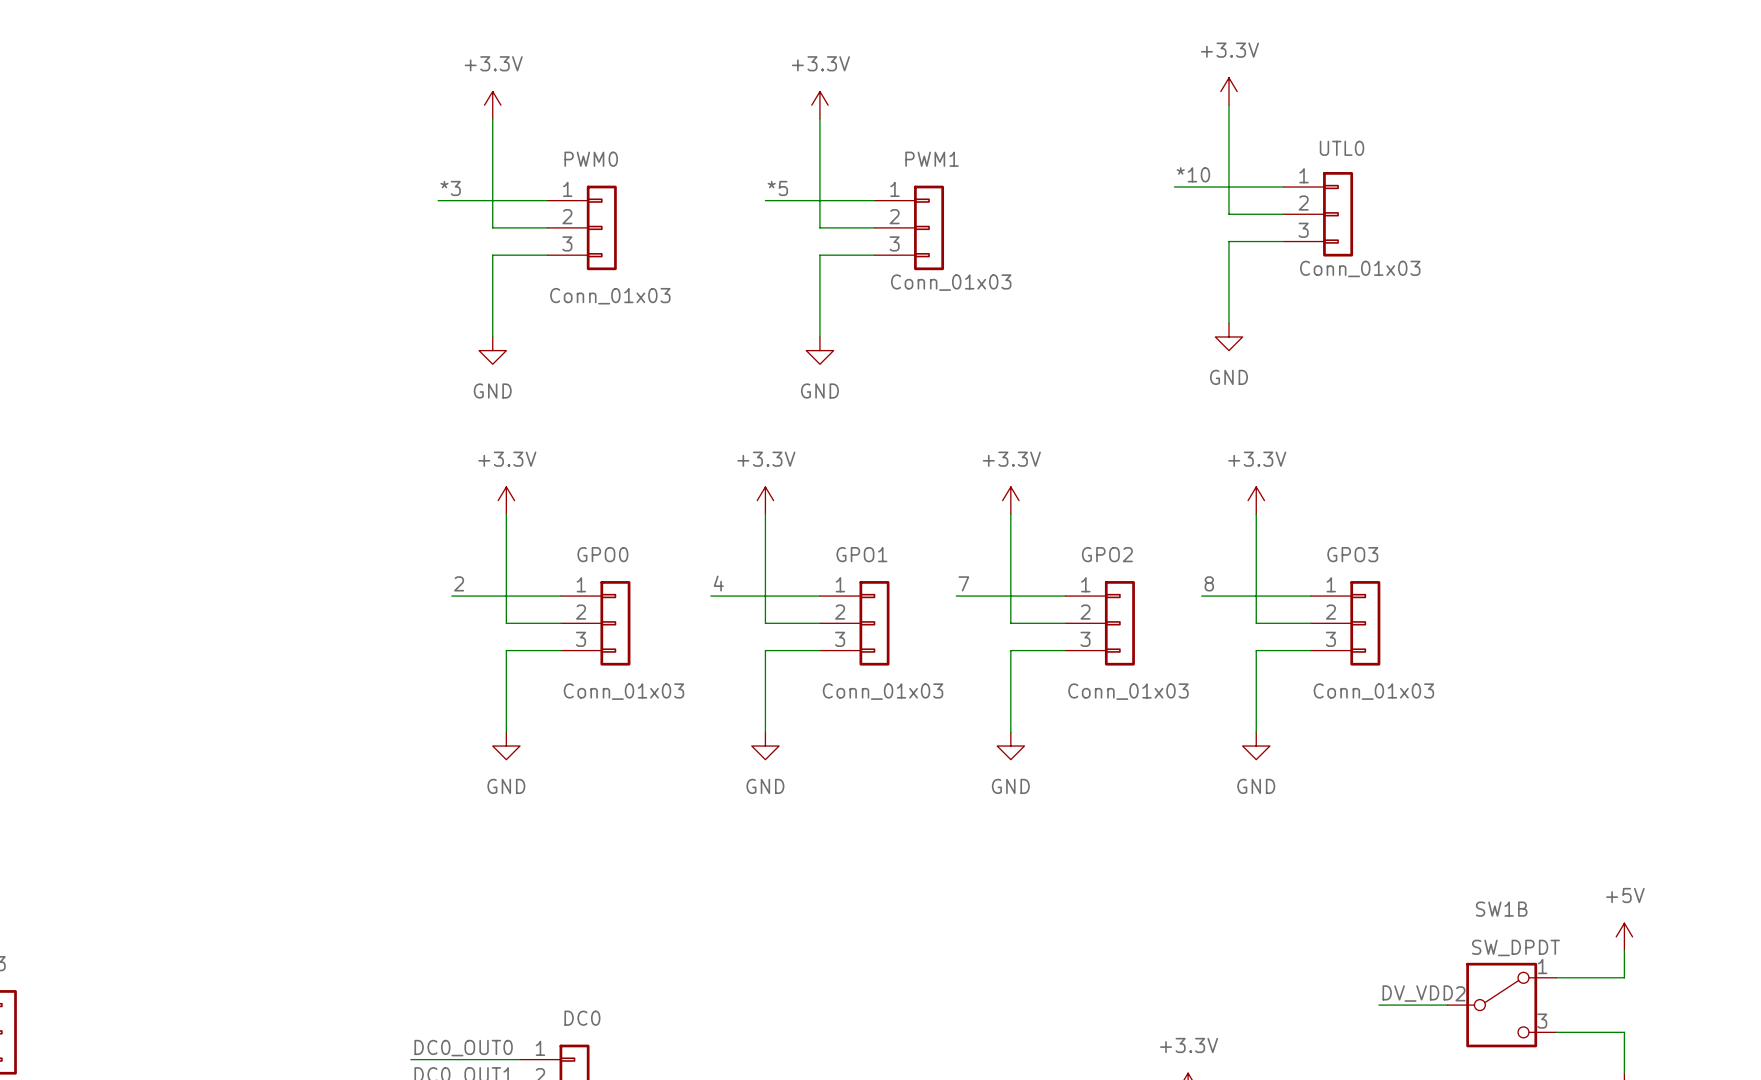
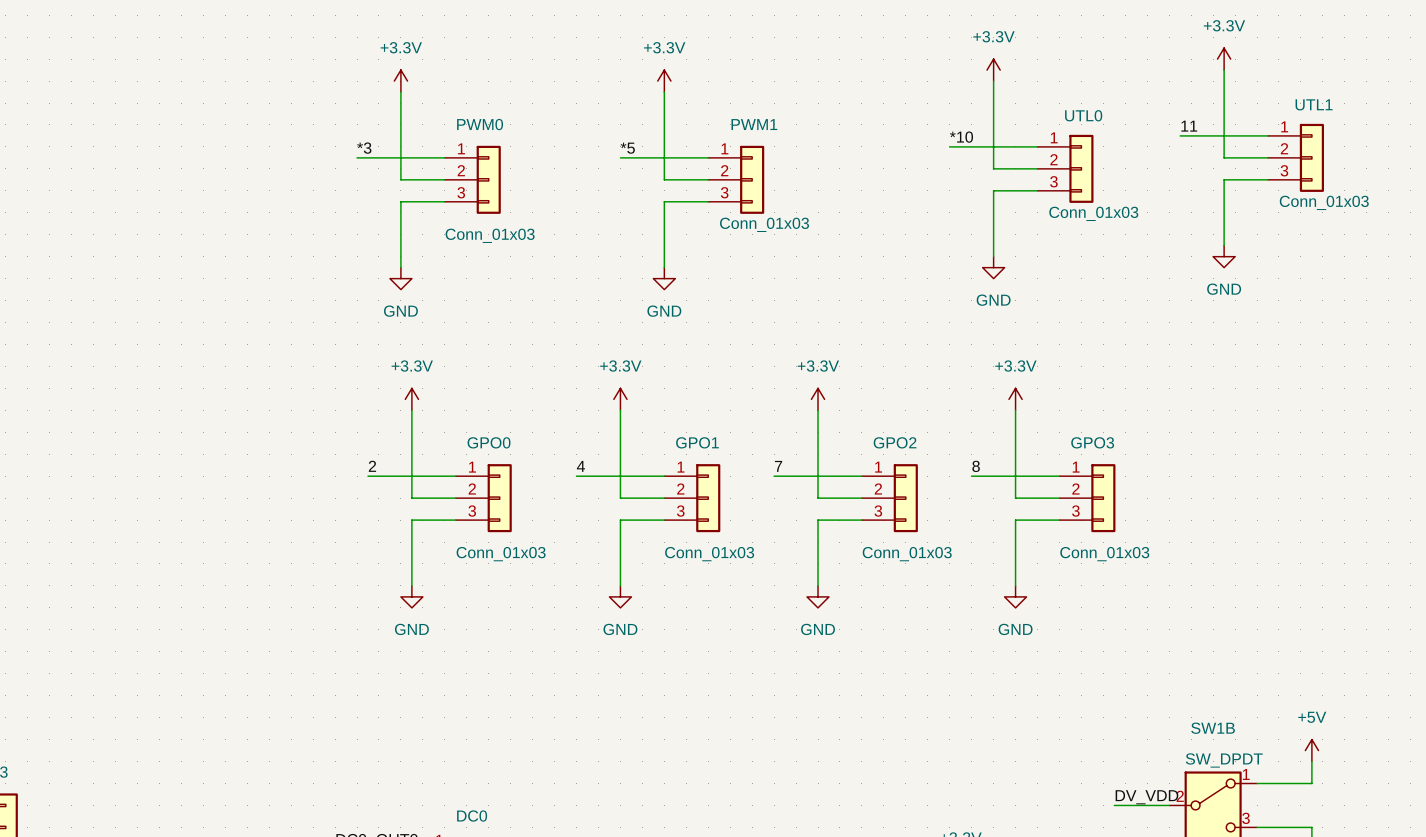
power symbol: none -> +3.3V (1224, 59)
wire: none -> (1224, 70) (1224, 157) (1268, 157)
label: none -> 11 (1189, 126)
wire: none -> (1180, 135) (1268, 135)
UTL1: none -> Conn_01x03 (1295, 157)
wire: none -> (1268, 179) (1224, 179) (1224, 245)
power symbol: none -> GND (1224, 256)

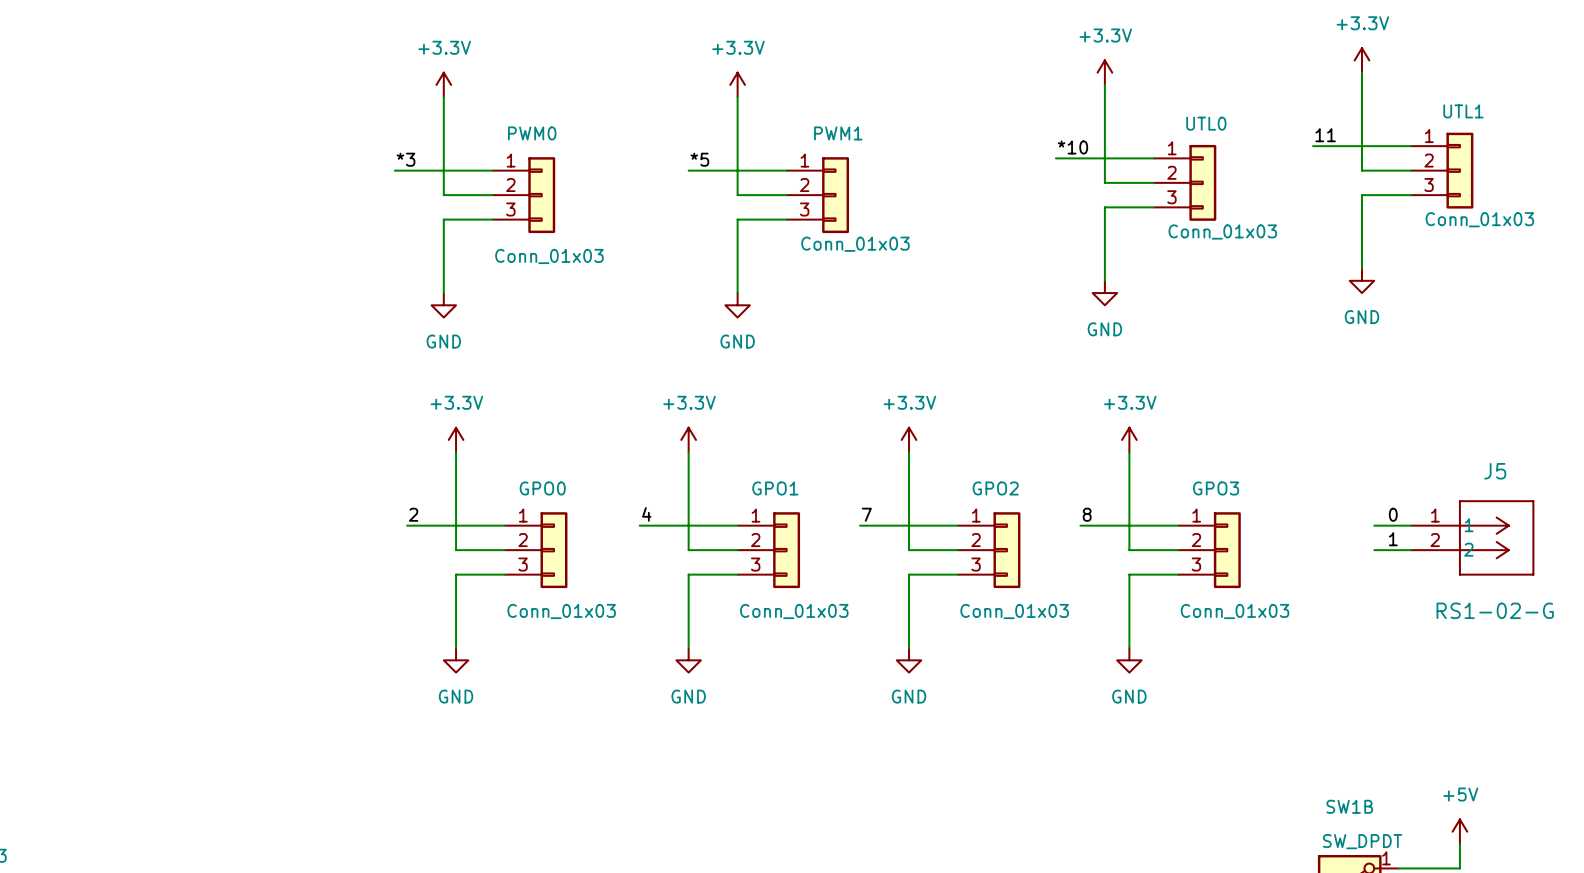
label: none -> 0 (1393, 514)
wire: none -> (1374, 525) (1410, 525)
J5: none -> RS1-02-G (1472, 537)
label: none -> 1 (1393, 539)
wire: none -> (1374, 550) (1410, 550)

